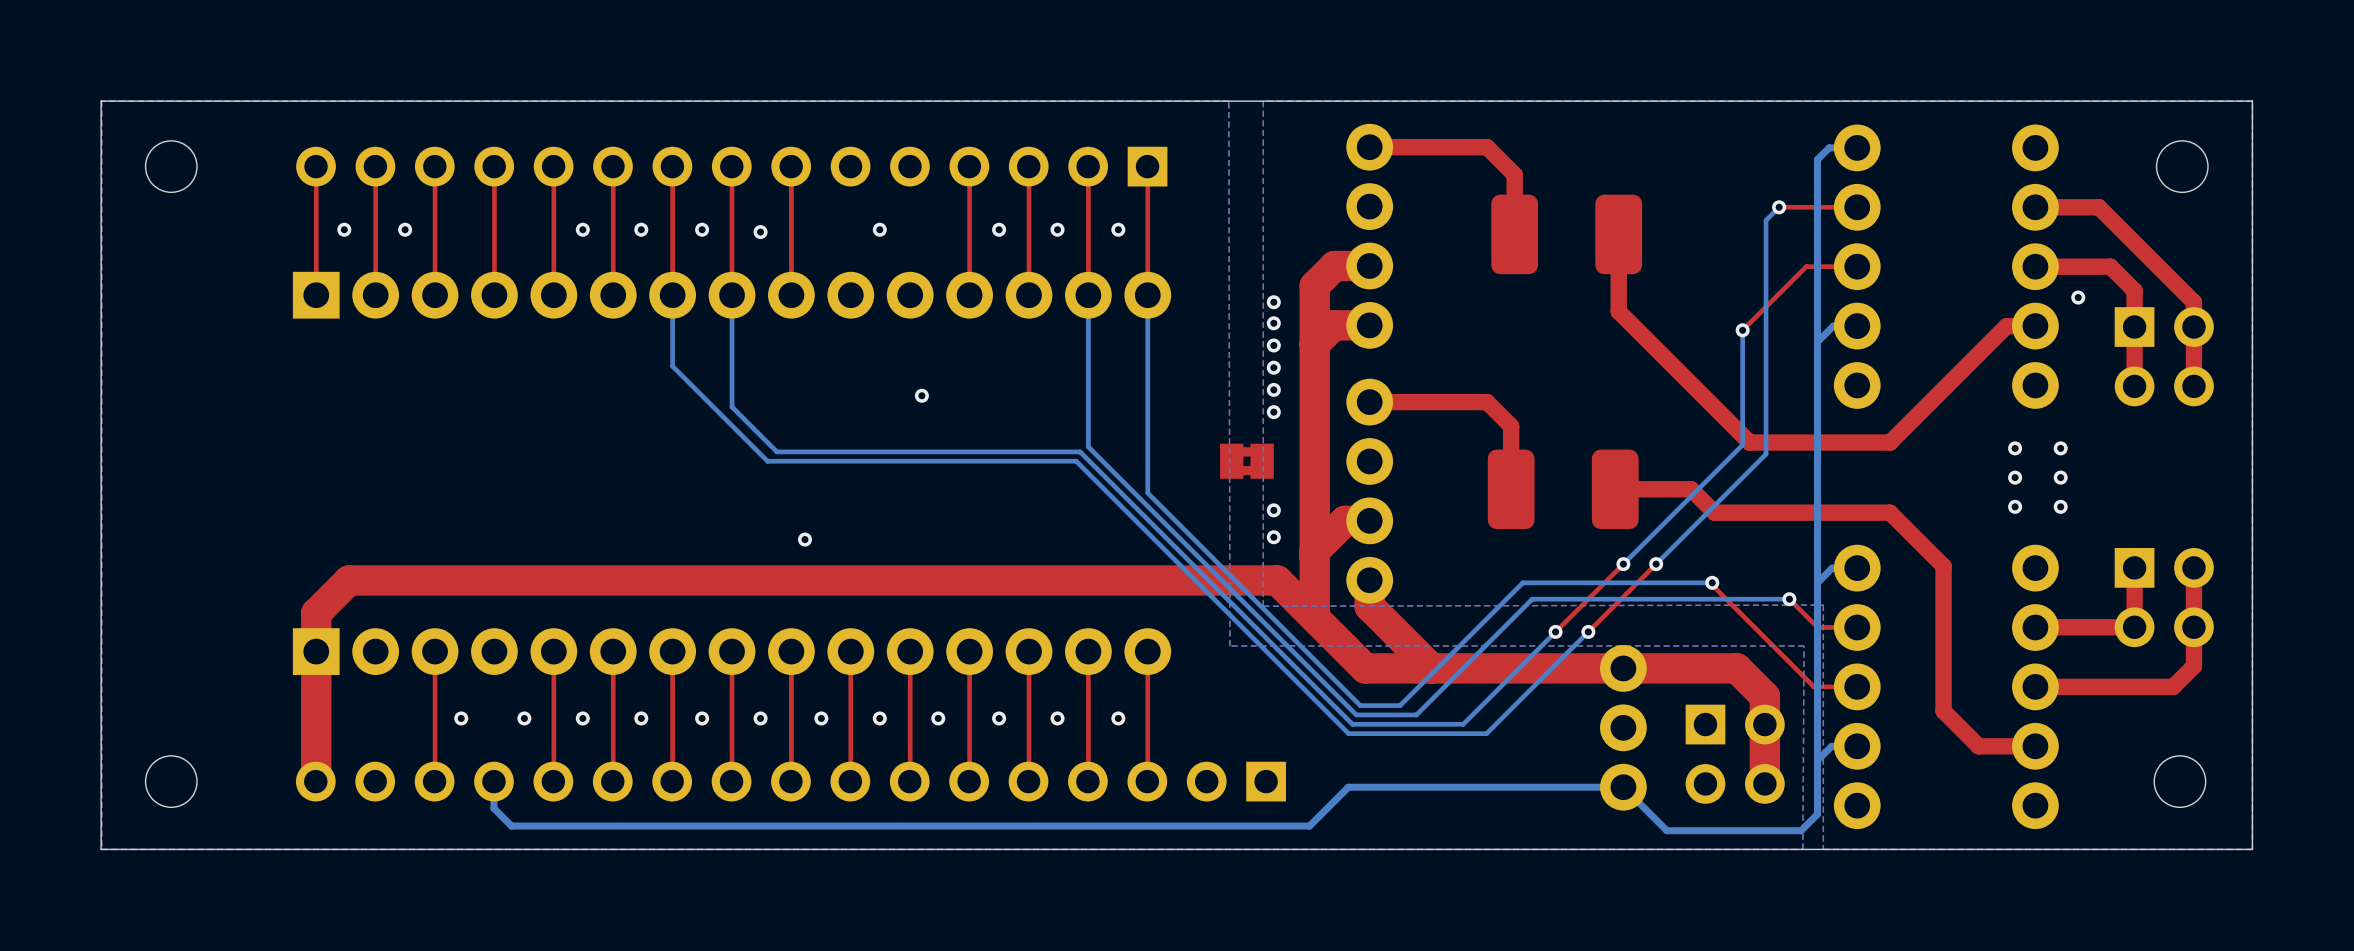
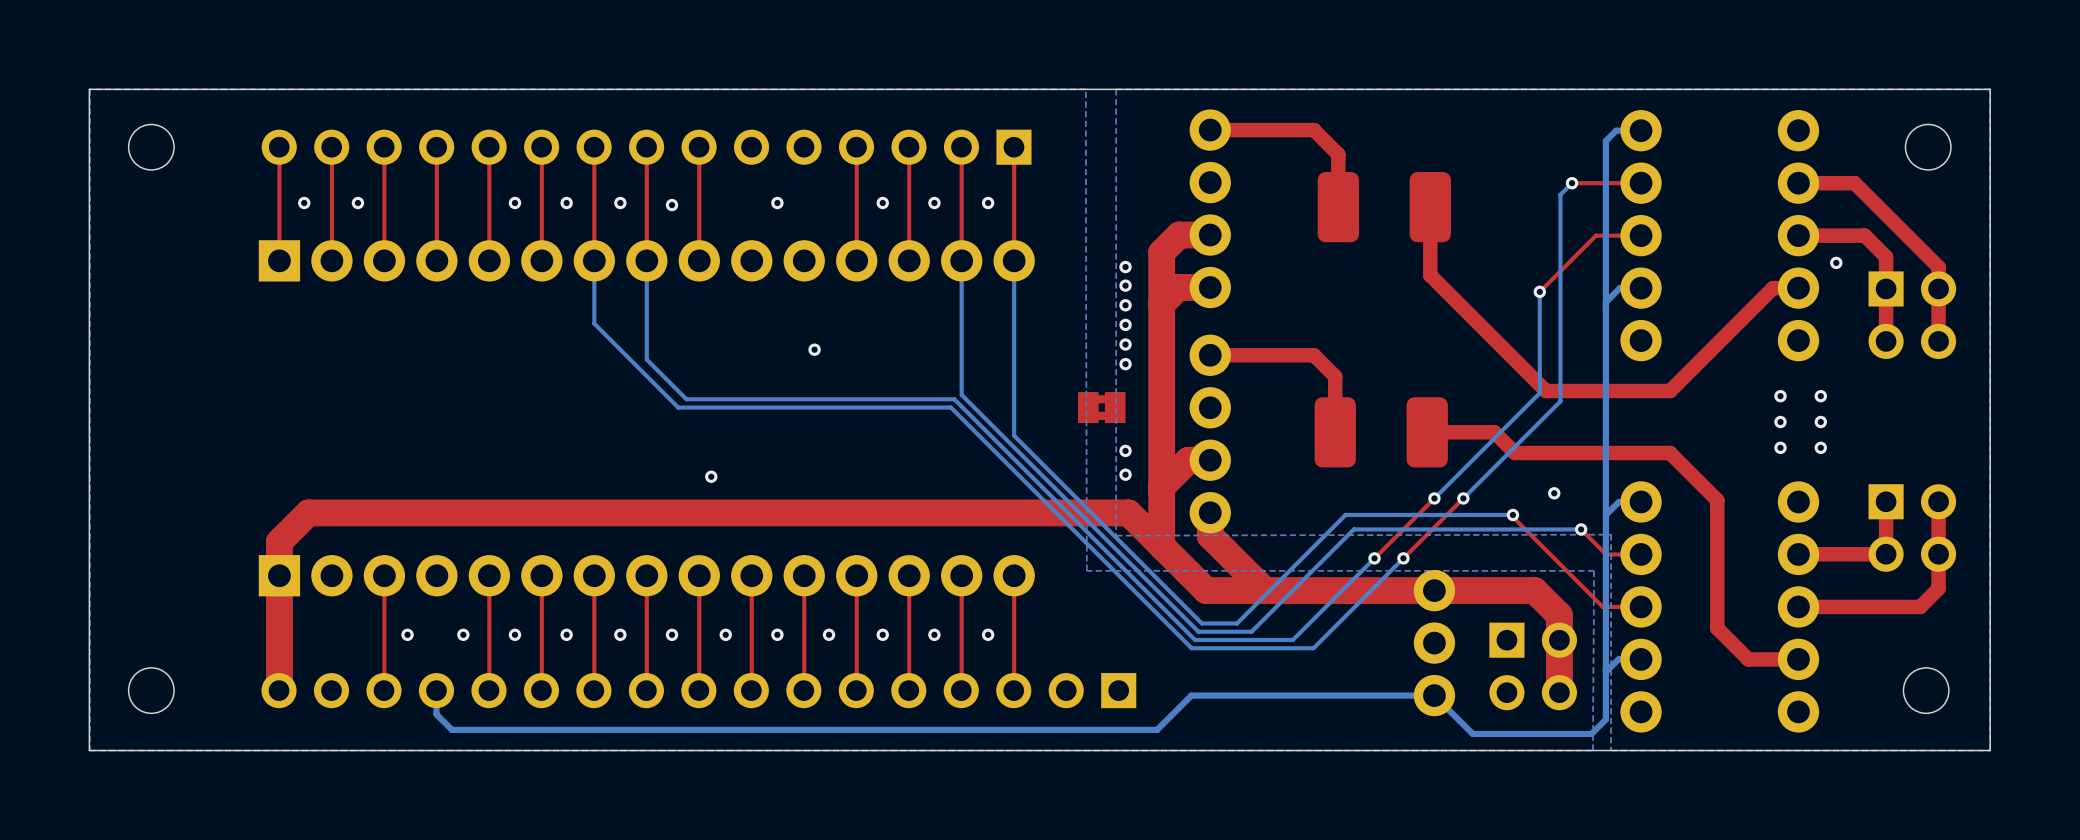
via: none -> (1554, 493)

